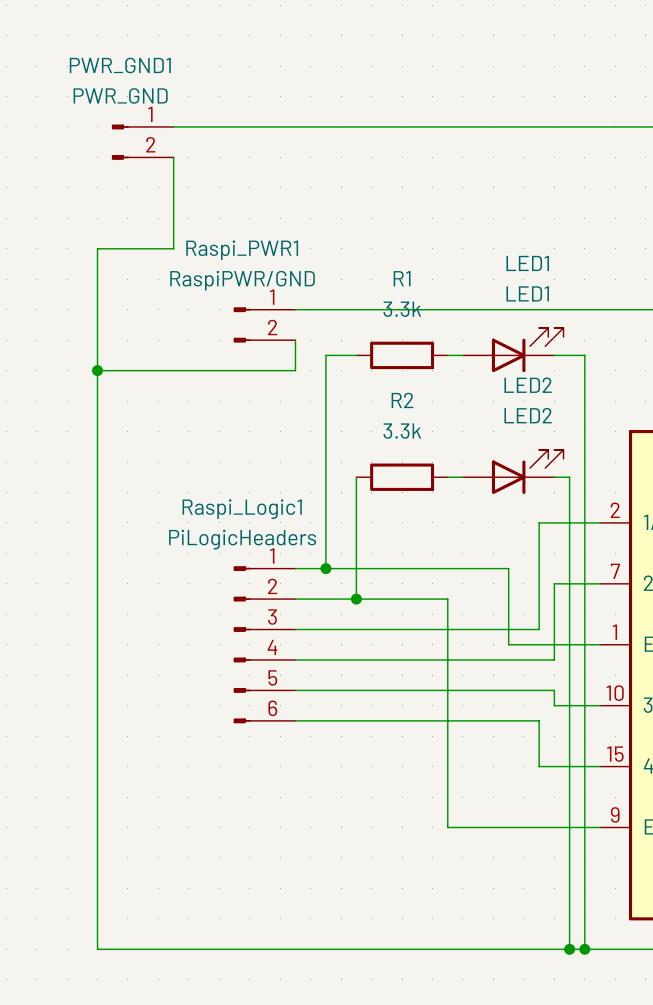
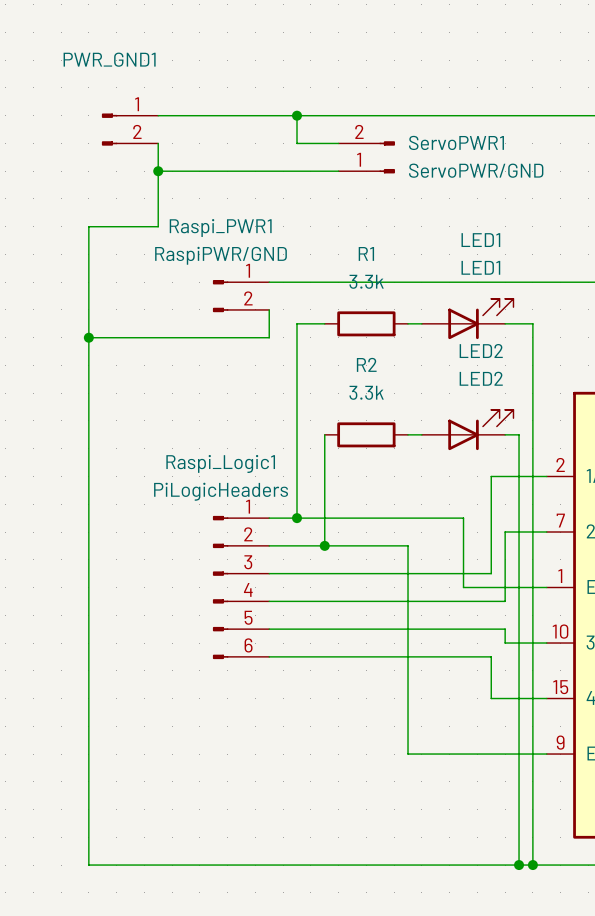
PWR_GND1 value: PWR_GND (120, 95) -> none
wire: none -> (297, 115) (297, 143) (338, 143)
junction: none -> (297, 115)
ServoPWR1: none -> ServoPWR/GND (366, 157)
wire: none -> (158, 171) (338, 171)
junction: none -> (158, 171)

